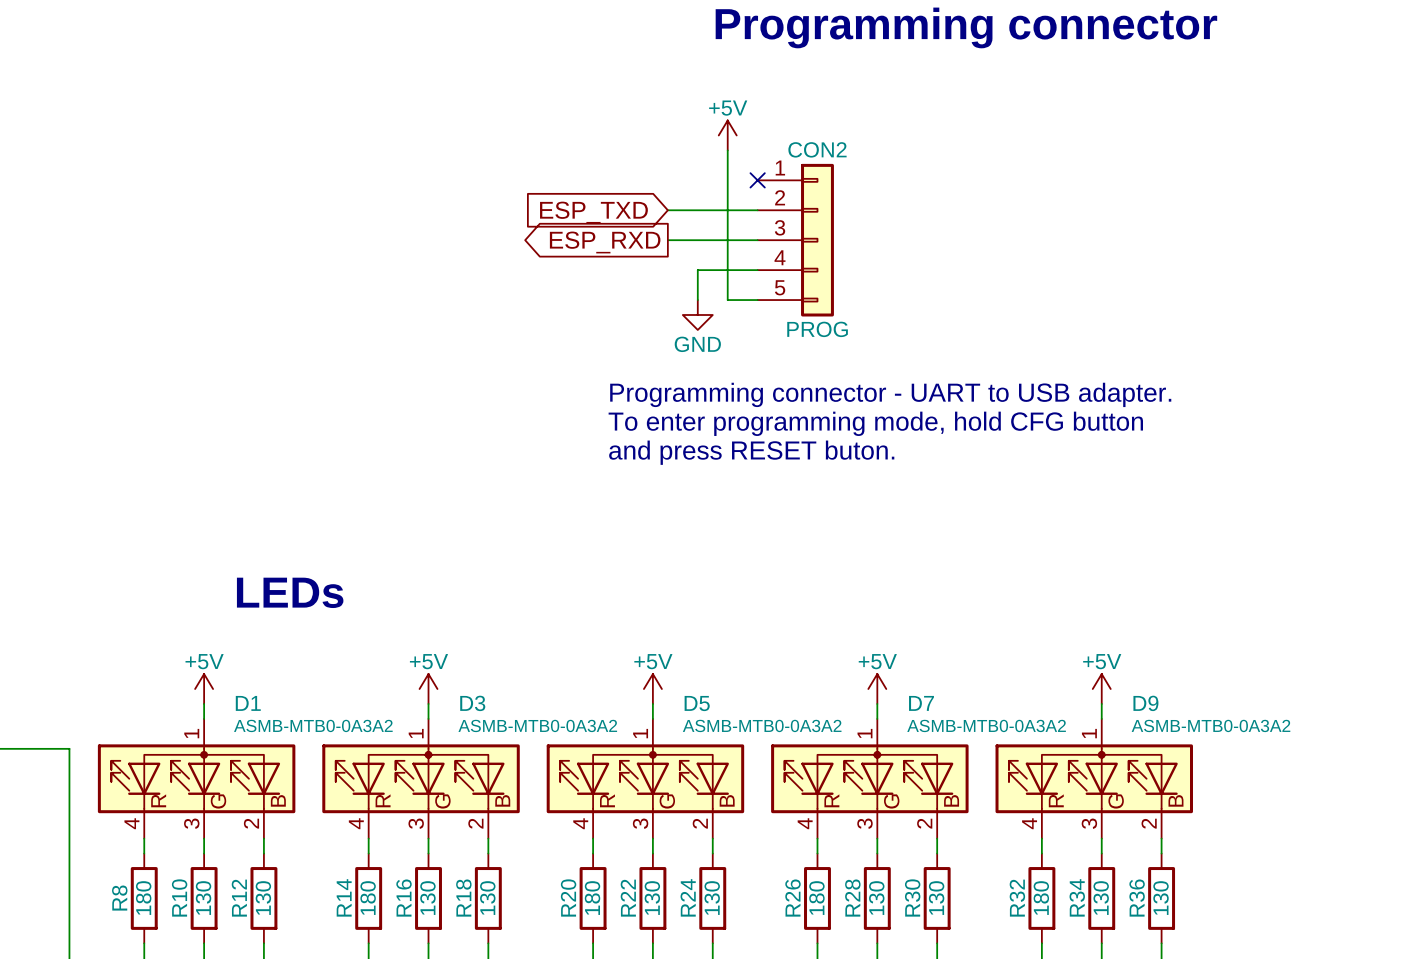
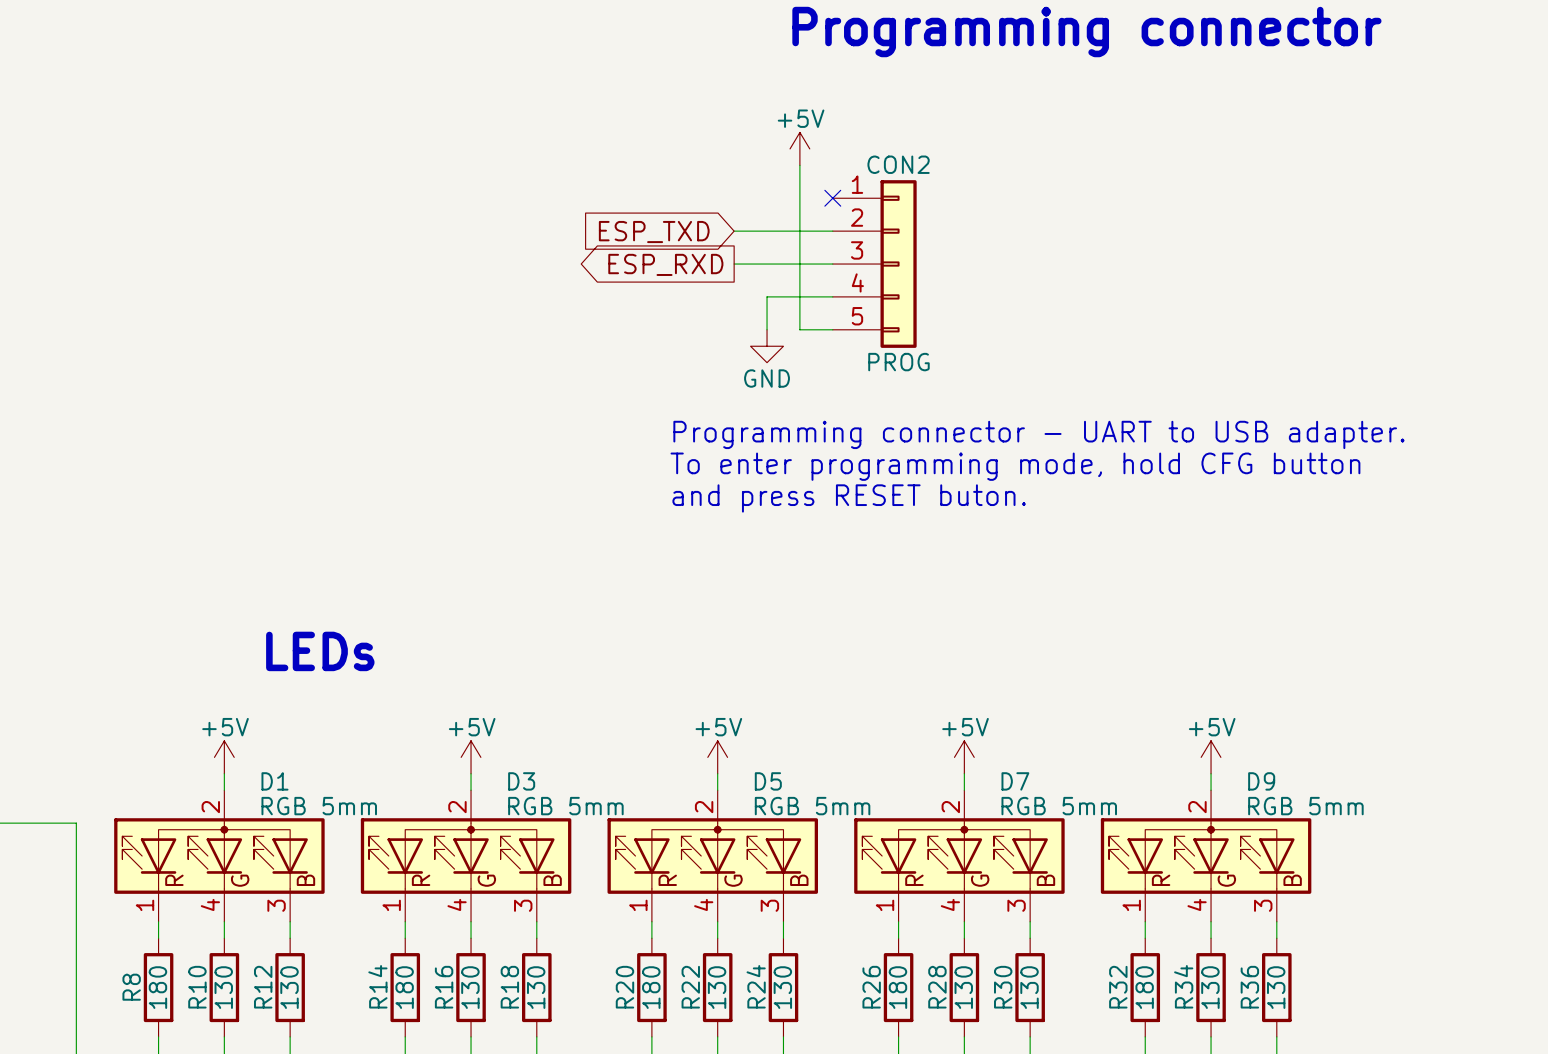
D1 symbol: [97, 718, 296, 839] -> [114, 790, 325, 922]
D3 symbol: [322, 718, 520, 839] -> [360, 790, 572, 922]
D5 symbol: [546, 718, 745, 839] -> [607, 790, 819, 922]
D7 symbol: [771, 718, 969, 839] -> [854, 790, 1065, 922]
D9 symbol: [995, 718, 1193, 839] -> [1100, 790, 1312, 922]
D1 value: ASMB-MTB0-0A3A2 (313, 725) -> RGB 5mm (319, 806)
D3 value: ASMB-MTB0-0A3A2 (537, 725) -> RGB 5mm (565, 806)
D5 value: ASMB-MTB0-0A3A2 (762, 725) -> RGB 5mm (812, 806)
D7 value: ASMB-MTB0-0A3A2 (986, 725) -> RGB 5mm (1059, 806)
D9 value: ASMB-MTB0-0A3A2 (1210, 725) -> RGB 5mm (1305, 806)

